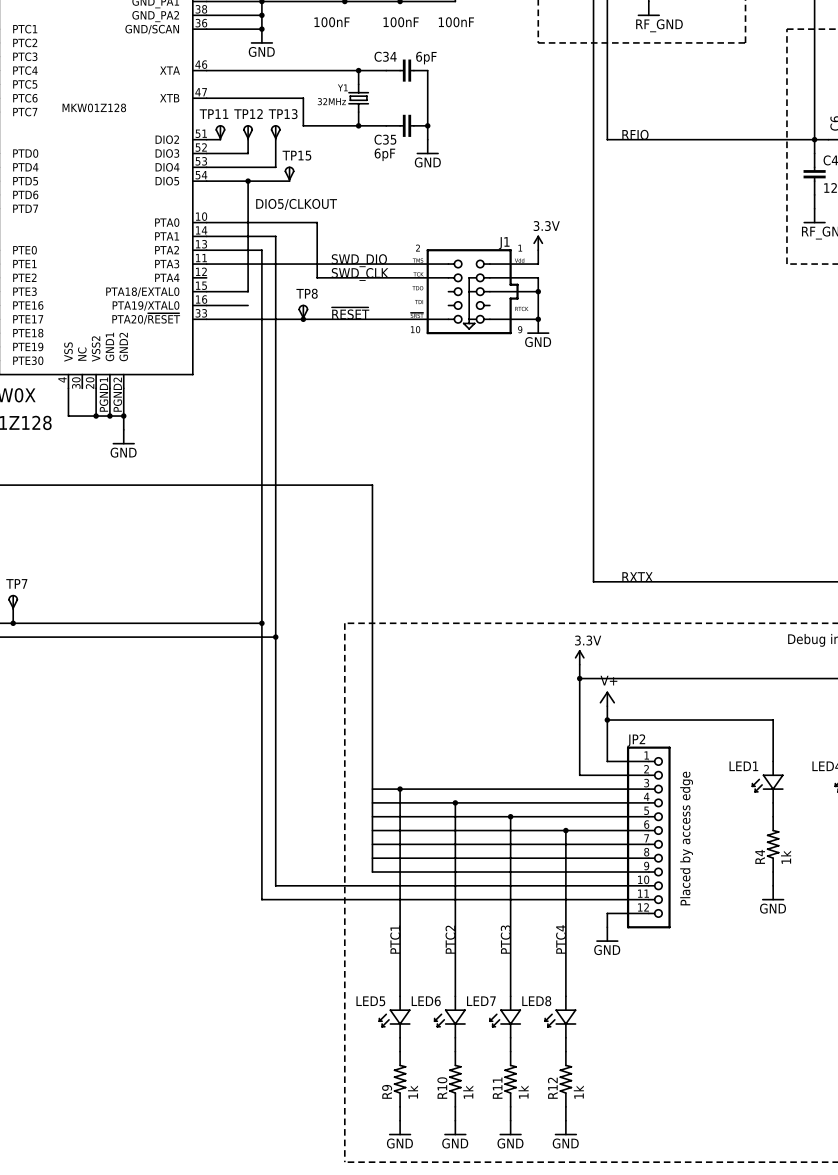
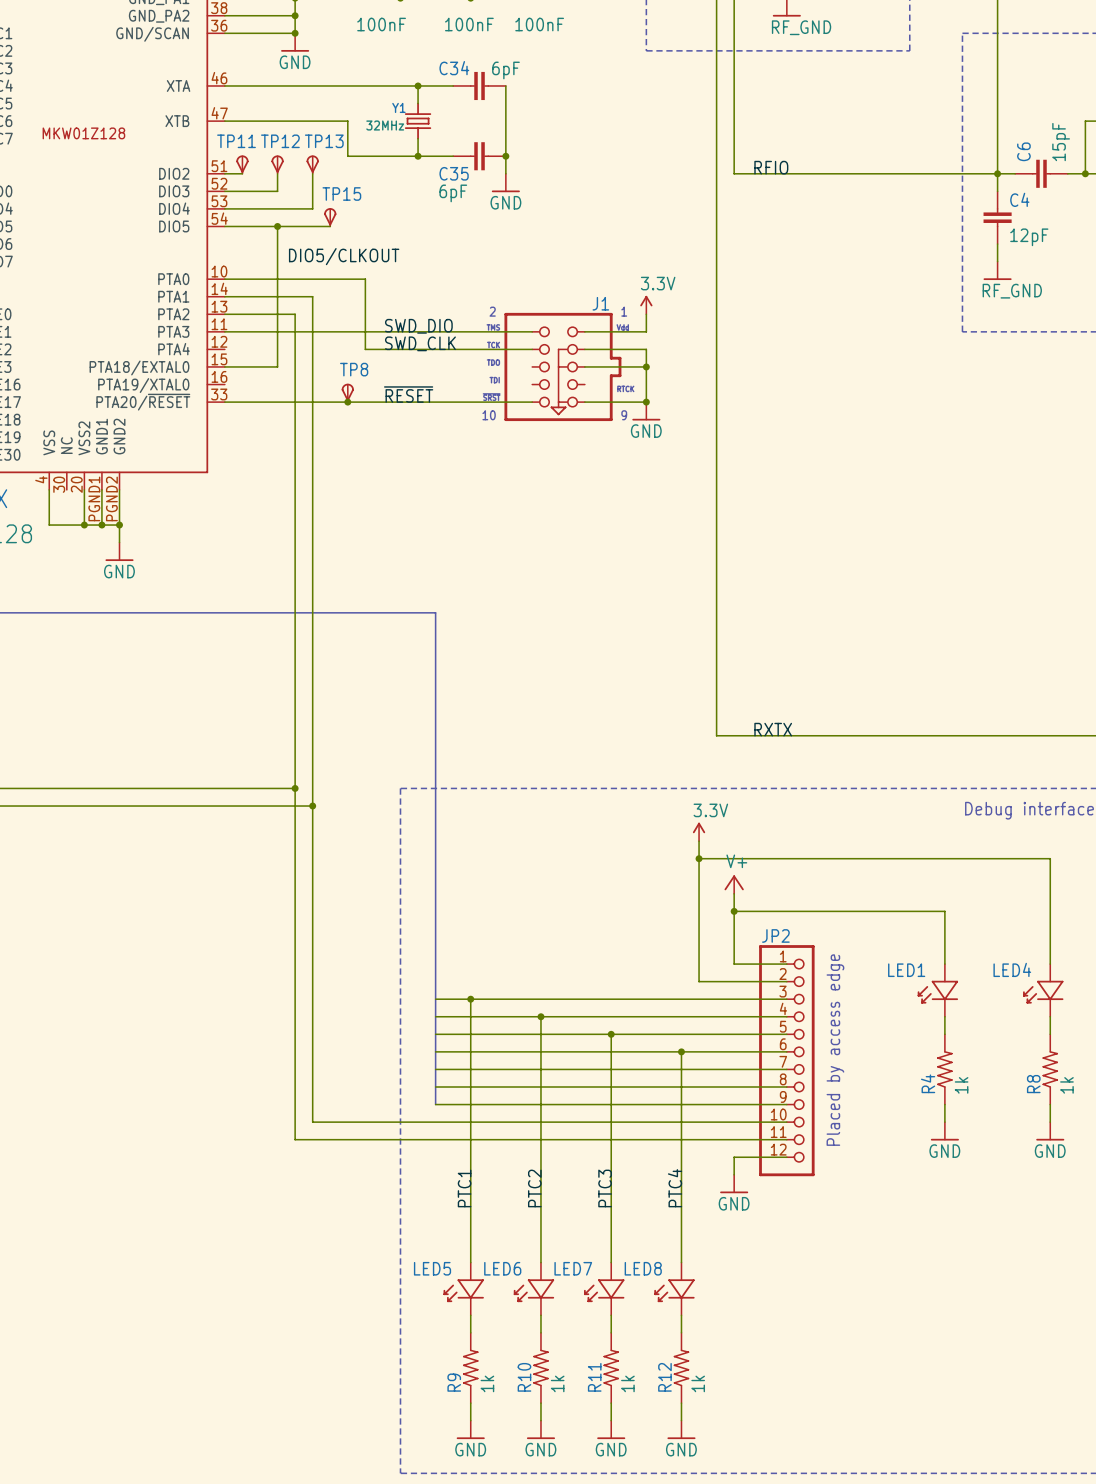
wire: (206, 305) (248, 305) -> none

